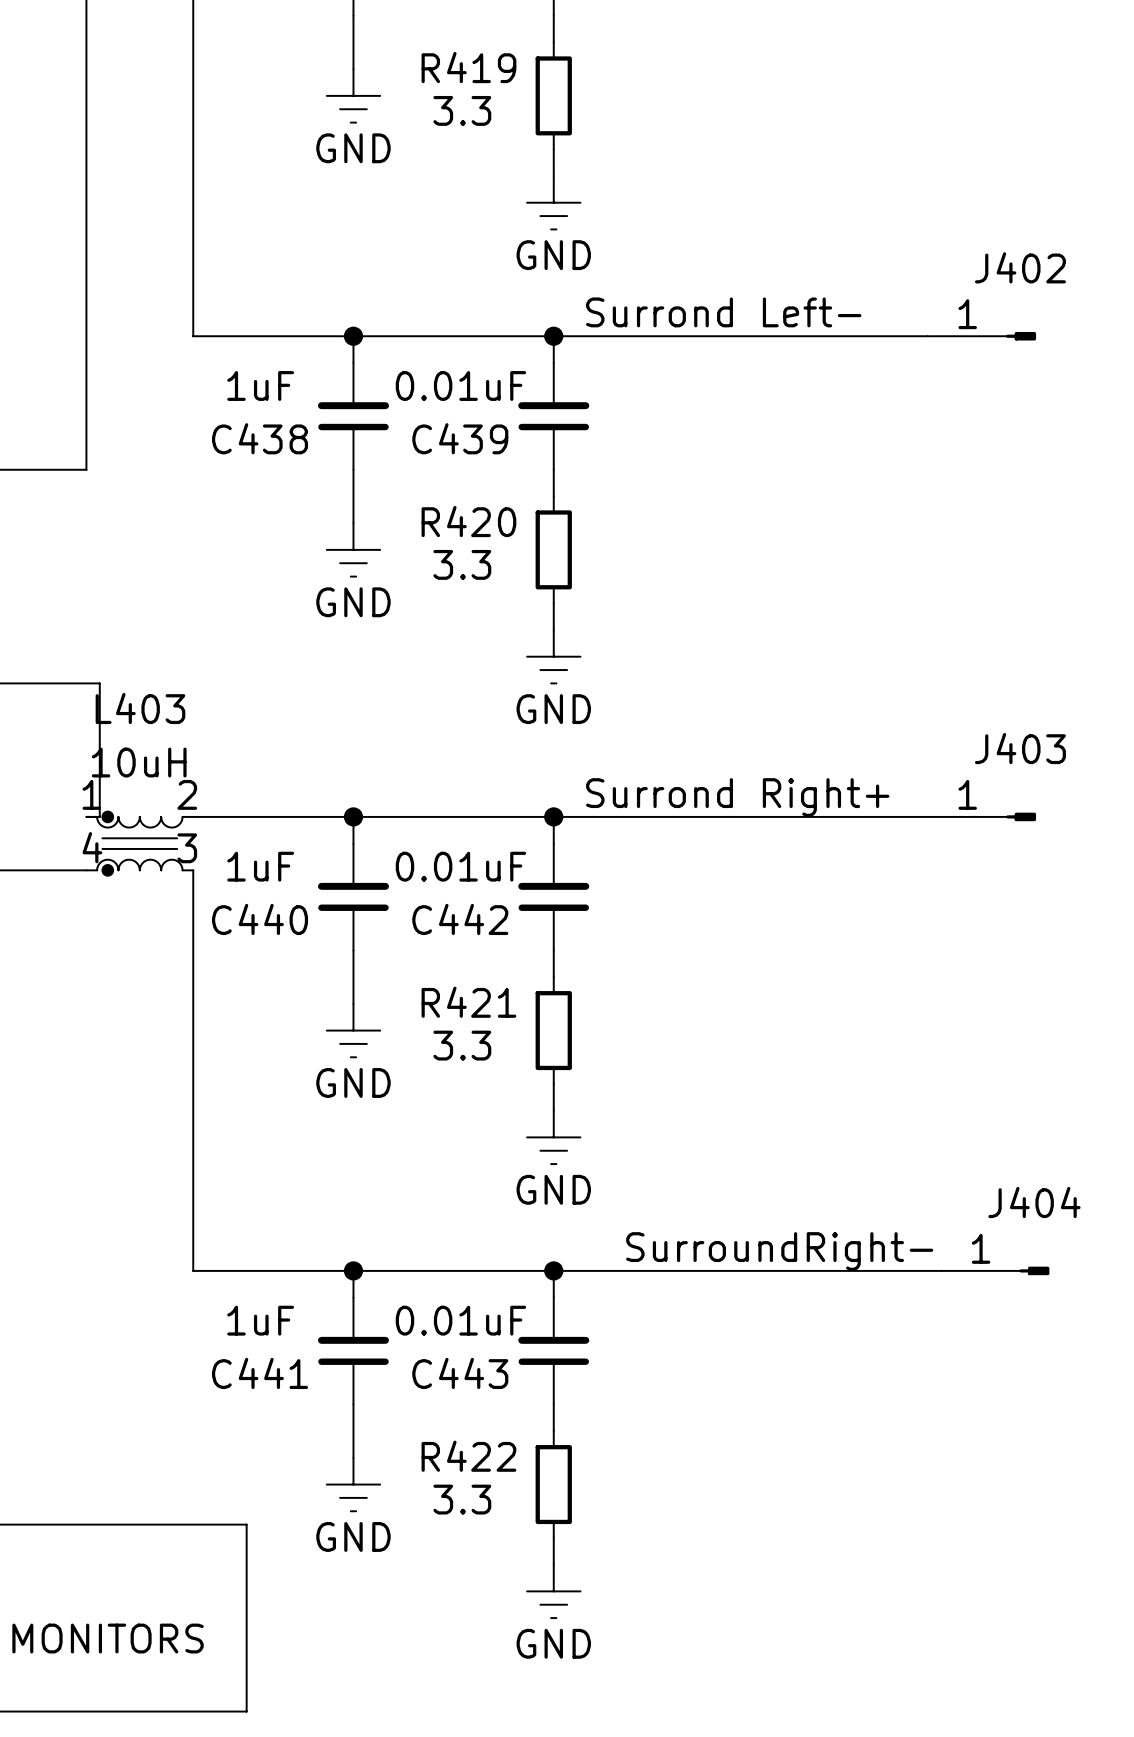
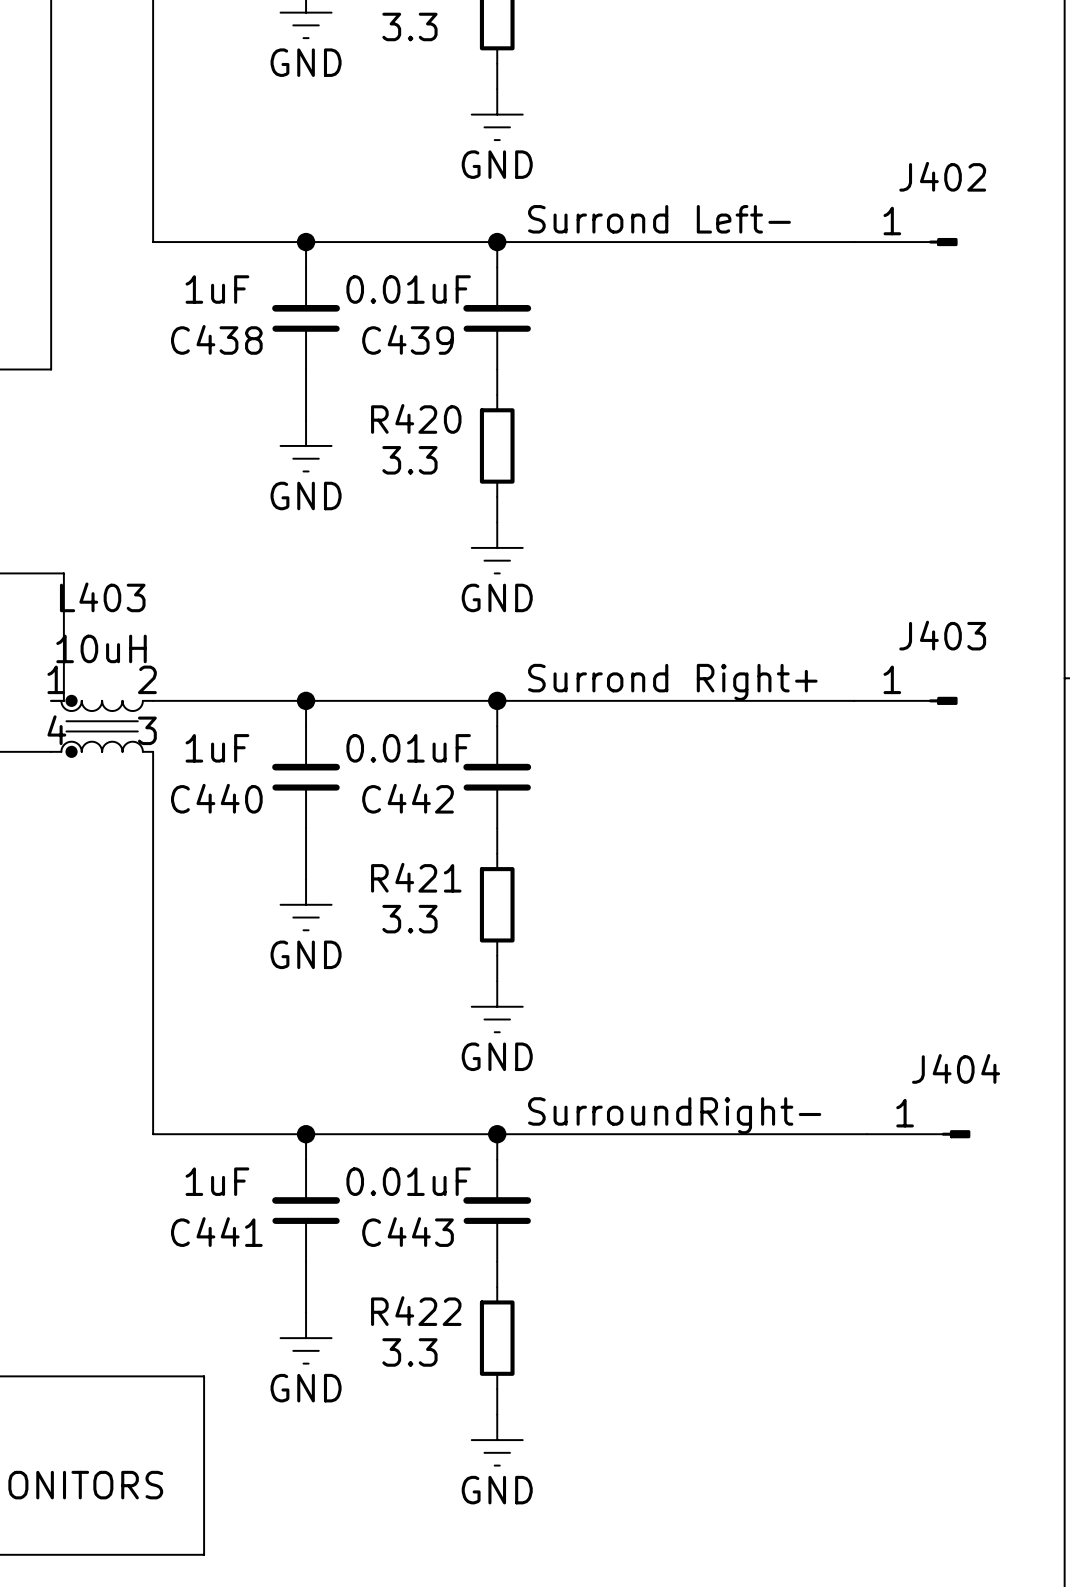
label position: SurroundRight- (779, 1251) -> SurroundRight- (674, 1115)

